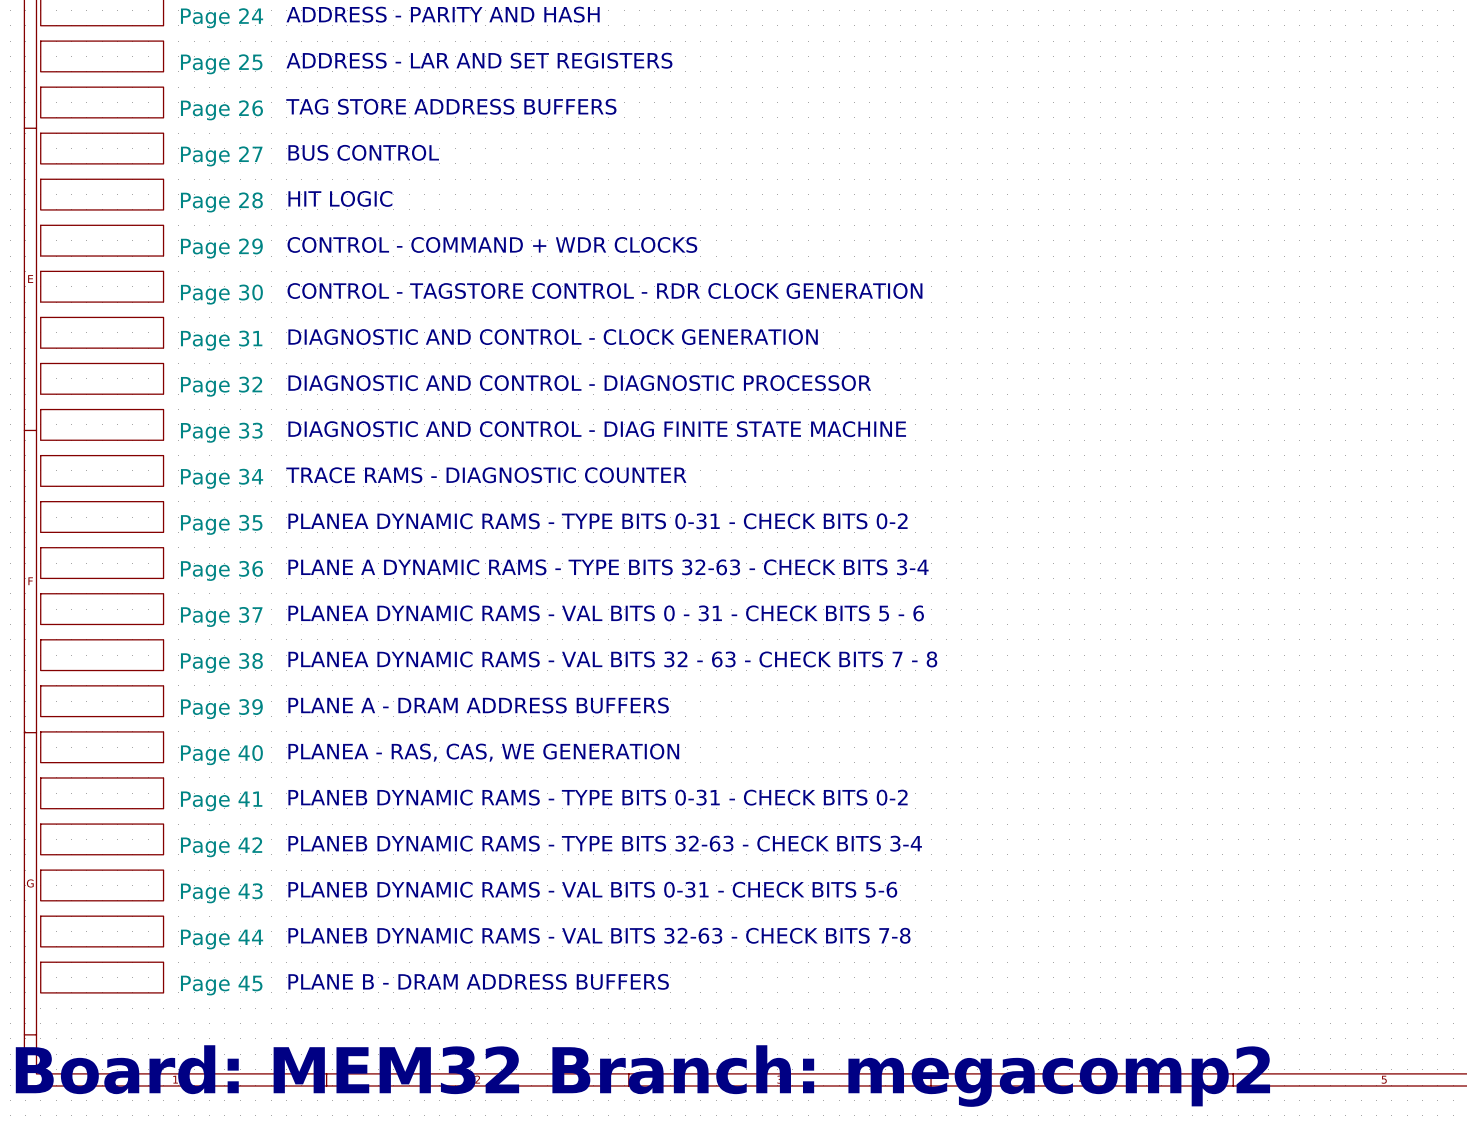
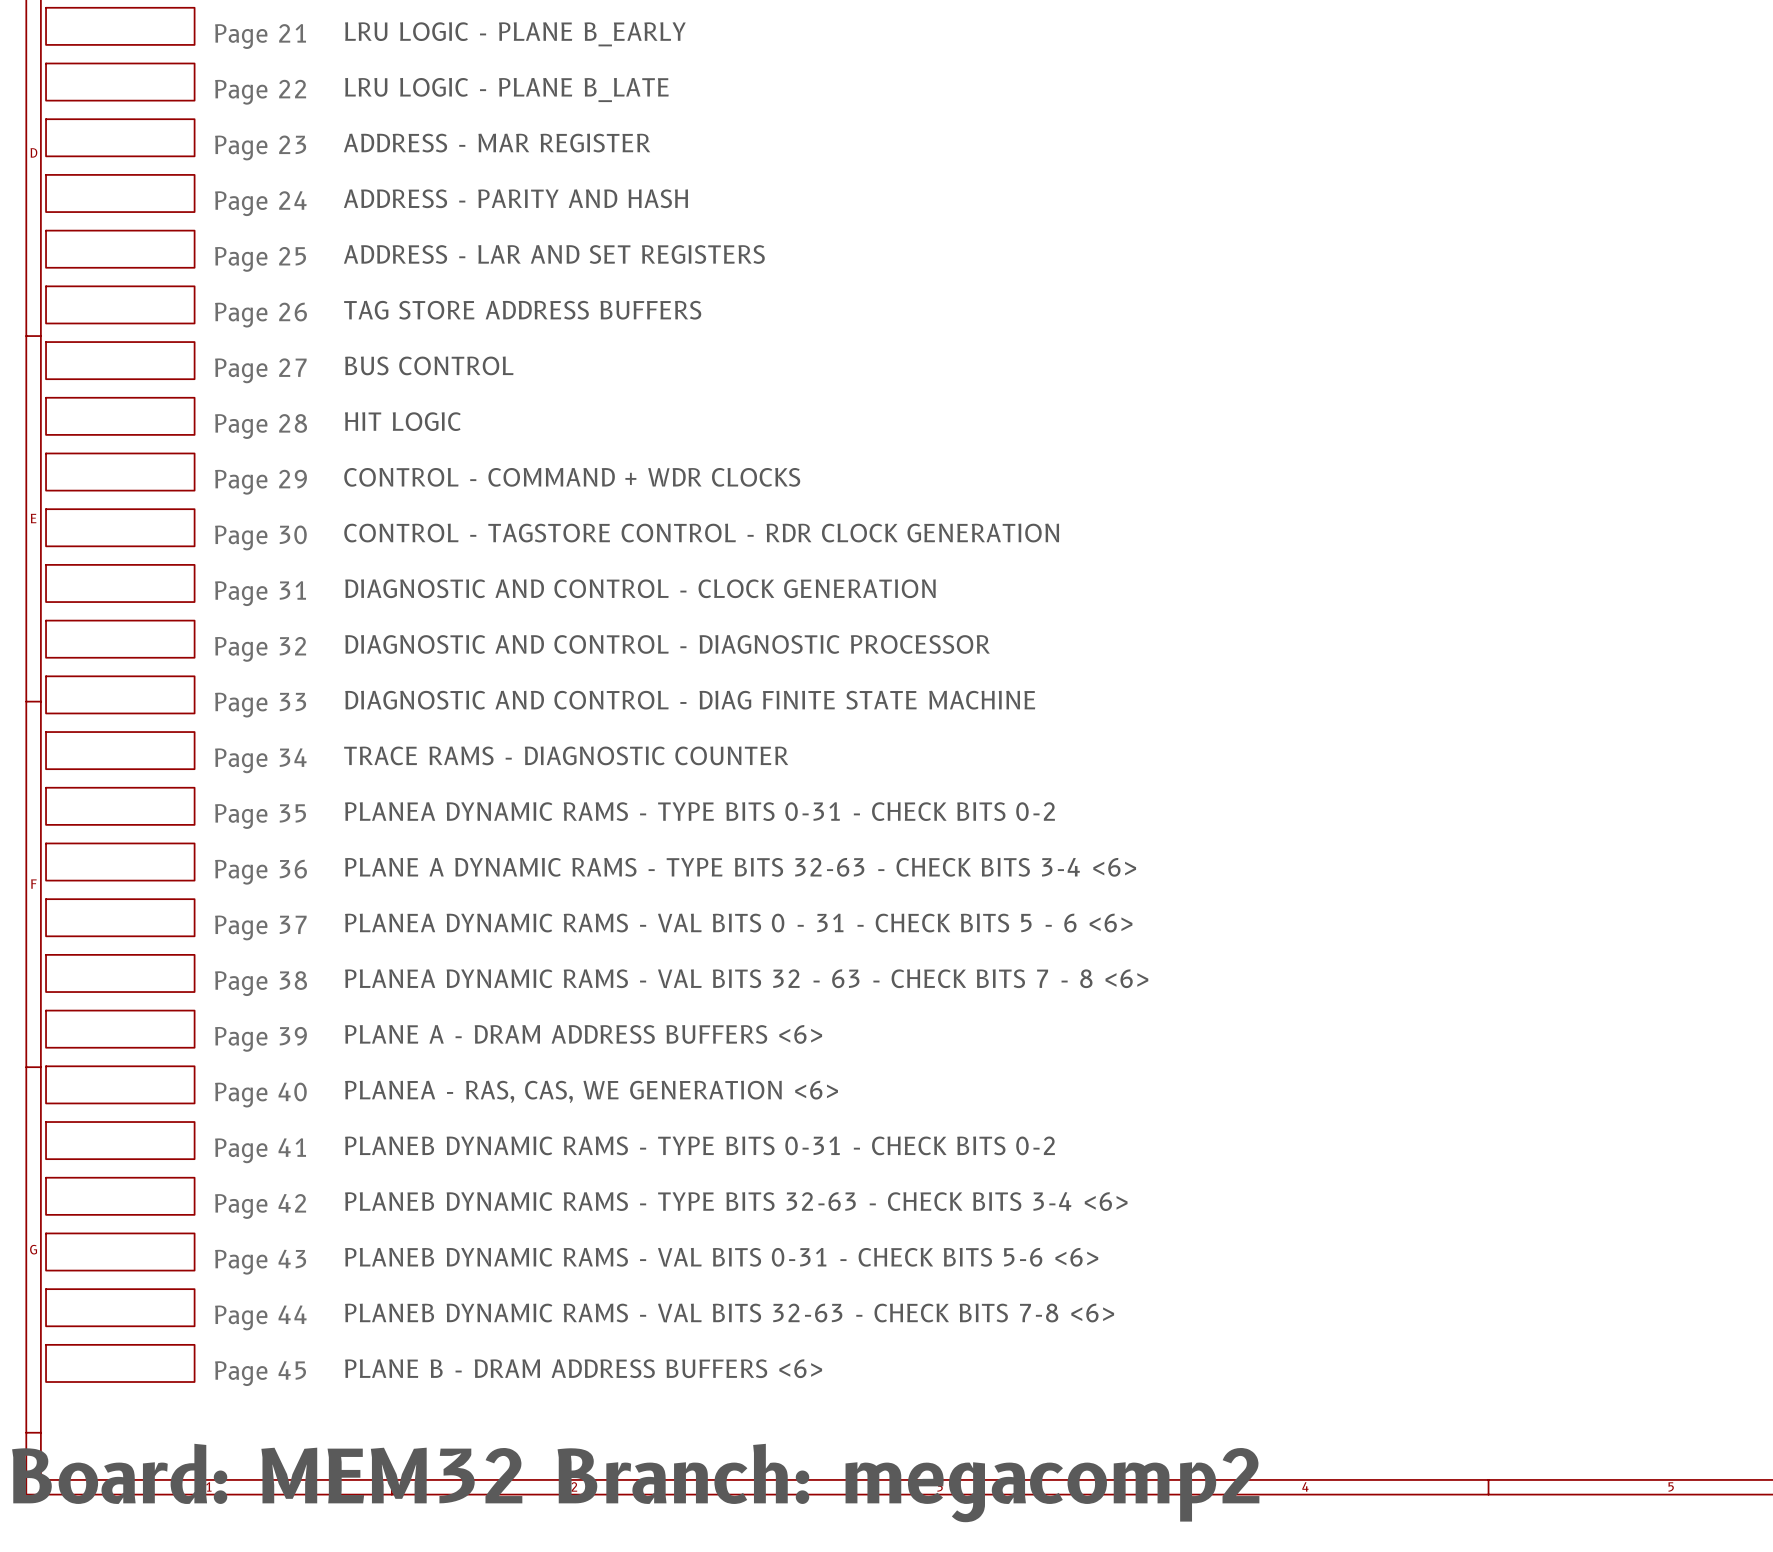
text: PLANE A DYNAMIC RAMS - TYPE BITS 32-63 - CHECK BITS 3-4 (608, 567) -> PLANE A DYNAMIC RAMS - TYPE BITS 32-63 - CHECK BITS 3-4 <6> (740, 867)
text: PLANEA DYNAMIC RAMS - VAL BITS 0 - 31 - CHECK BITS 5 - 6 (606, 613) -> PLANEA DYNAMIC RAMS - VAL BITS 0 - 31 - CHECK BITS 5 - 6 <6> (738, 923)
text: PLANEA DYNAMIC RAMS - VAL BITS 32 - 63 - CHECK BITS 7 - 8 (612, 659) -> PLANEA DYNAMIC RAMS - VAL BITS 32 - 63 - CHECK BITS 7 - 8 <6> (746, 978)
text: PLANE A - DRAM ADDRESS BUFFERS (478, 705) -> PLANE A - DRAM ADDRESS BUFFERS <6> (583, 1034)
text: PLANEA - RAS, CAS, WE GENERATION (483, 752) -> PLANEA - RAS, CAS, WE GENERATION <6> (591, 1091)
text: PLANEB DYNAMIC RAMS - TYPE BITS 32-63 - CHECK BITS 3-4 (605, 843) -> PLANEB DYNAMIC RAMS - TYPE BITS 32-63 - CHECK BITS 3-4 <6> (736, 1201)
text: PLANEB DYNAMIC RAMS - VAL BITS 0-31 - CHECK BITS 5-6 (592, 889) -> PLANEB DYNAMIC RAMS - VAL BITS 0-31 - CHECK BITS 5-6 <6> (721, 1257)
text: PLANEB DYNAMIC RAMS - VAL BITS 32-63 - CHECK BITS 7-8 (599, 935) -> PLANEB DYNAMIC RAMS - VAL BITS 32-63 - CHECK BITS 7-8 <6> (729, 1313)
text: PLANE B - DRAM ADDRESS BUFFERS (478, 981) -> PLANE B - DRAM ADDRESS BUFFERS <6> (583, 1368)

